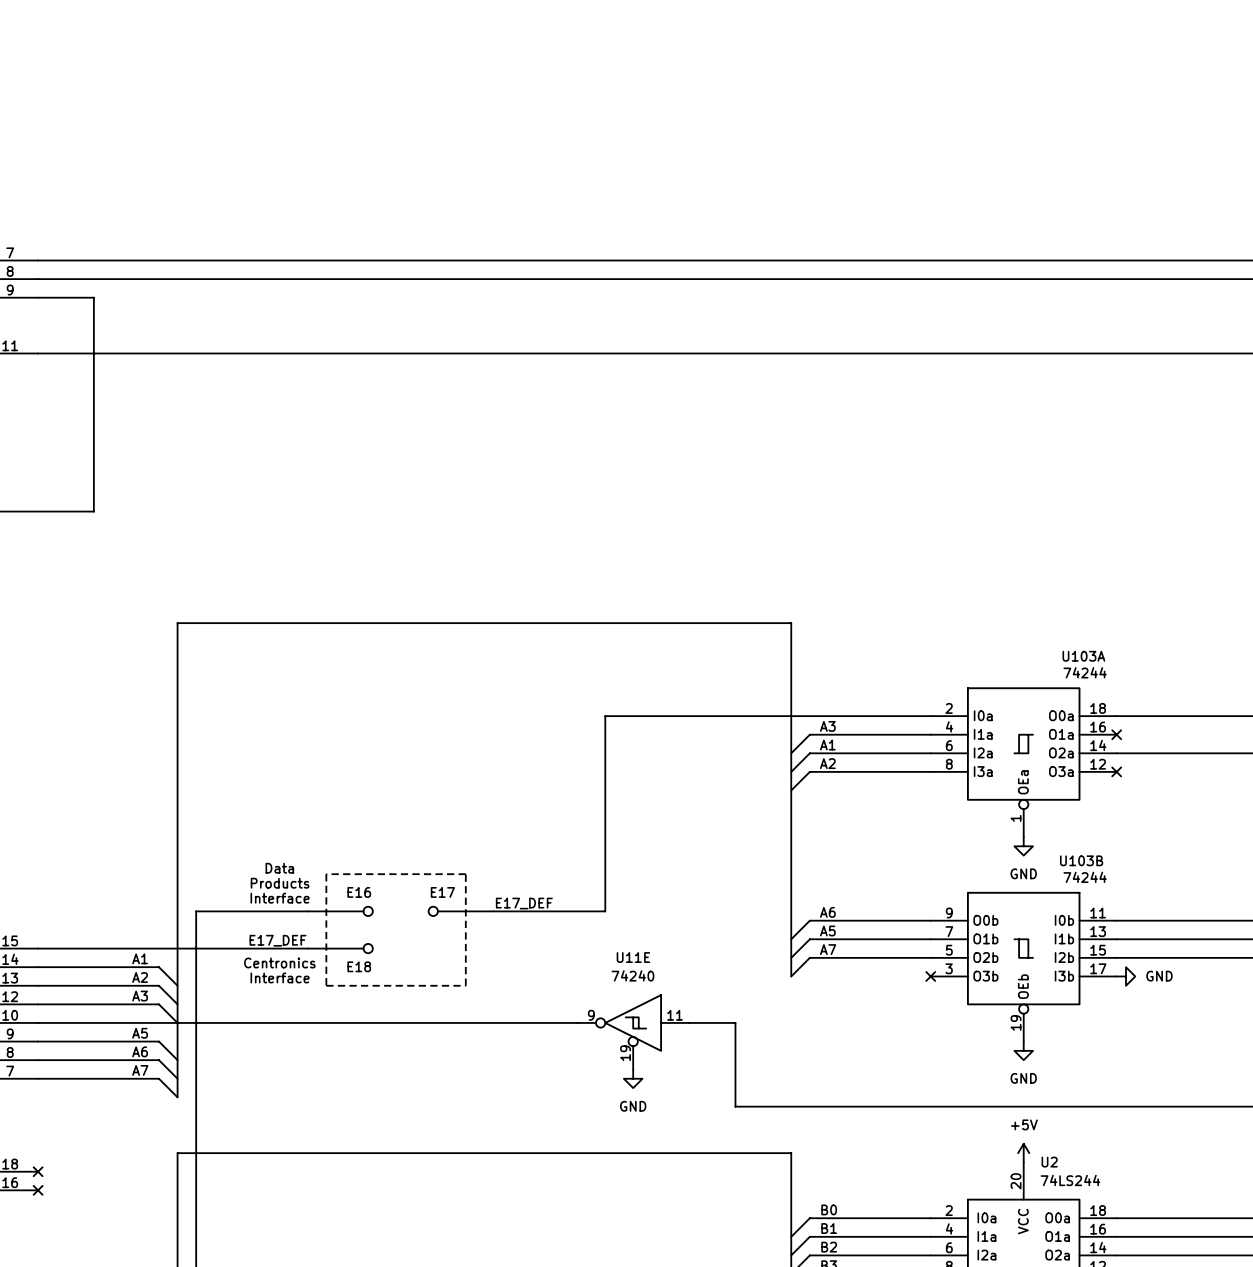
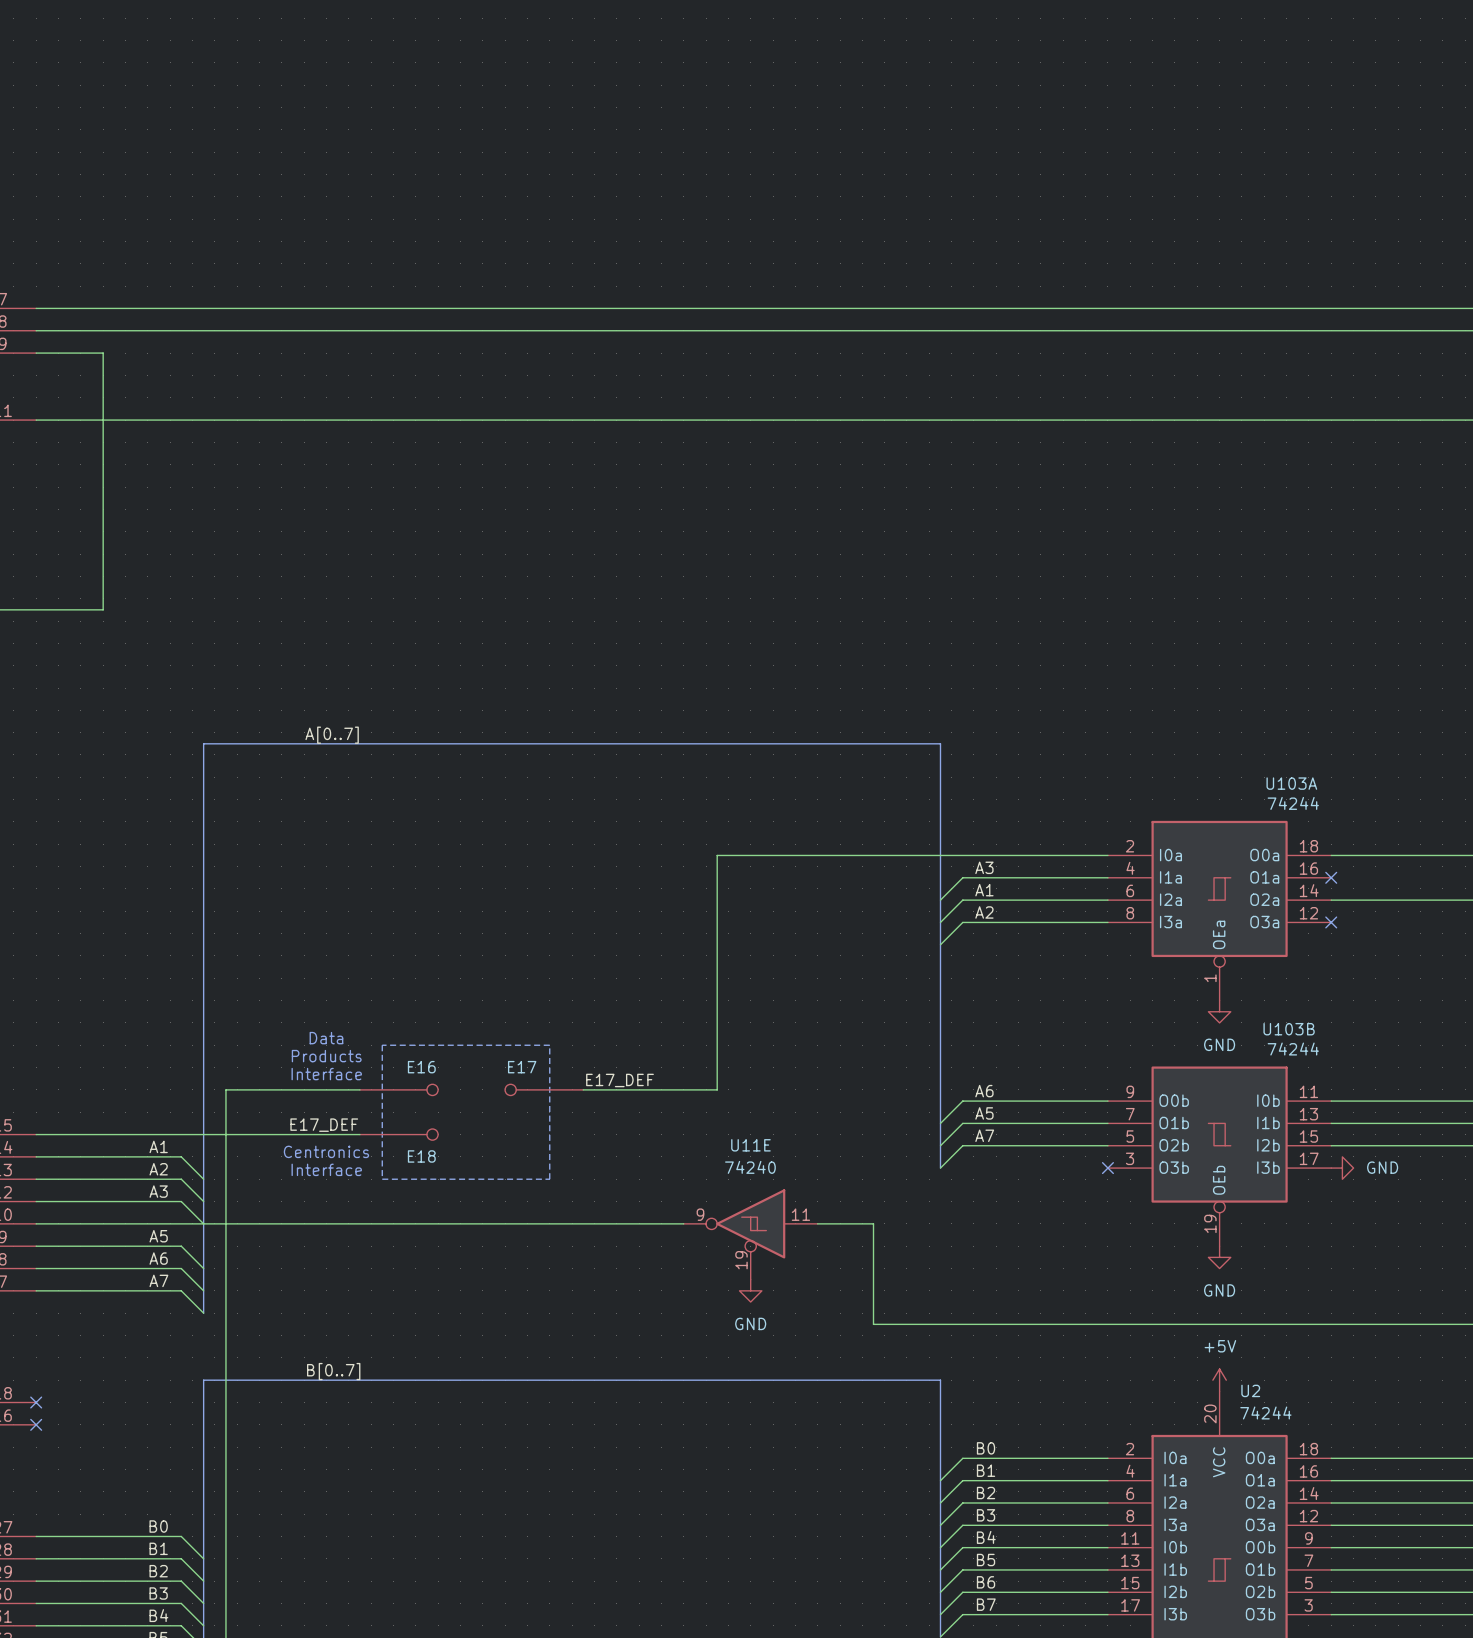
label: none -> A[0..7] (332, 735)
label: none -> B[0..7] (333, 1371)
U2 value: 74LS244 (1070, 1180) -> 74244 (1265, 1412)

